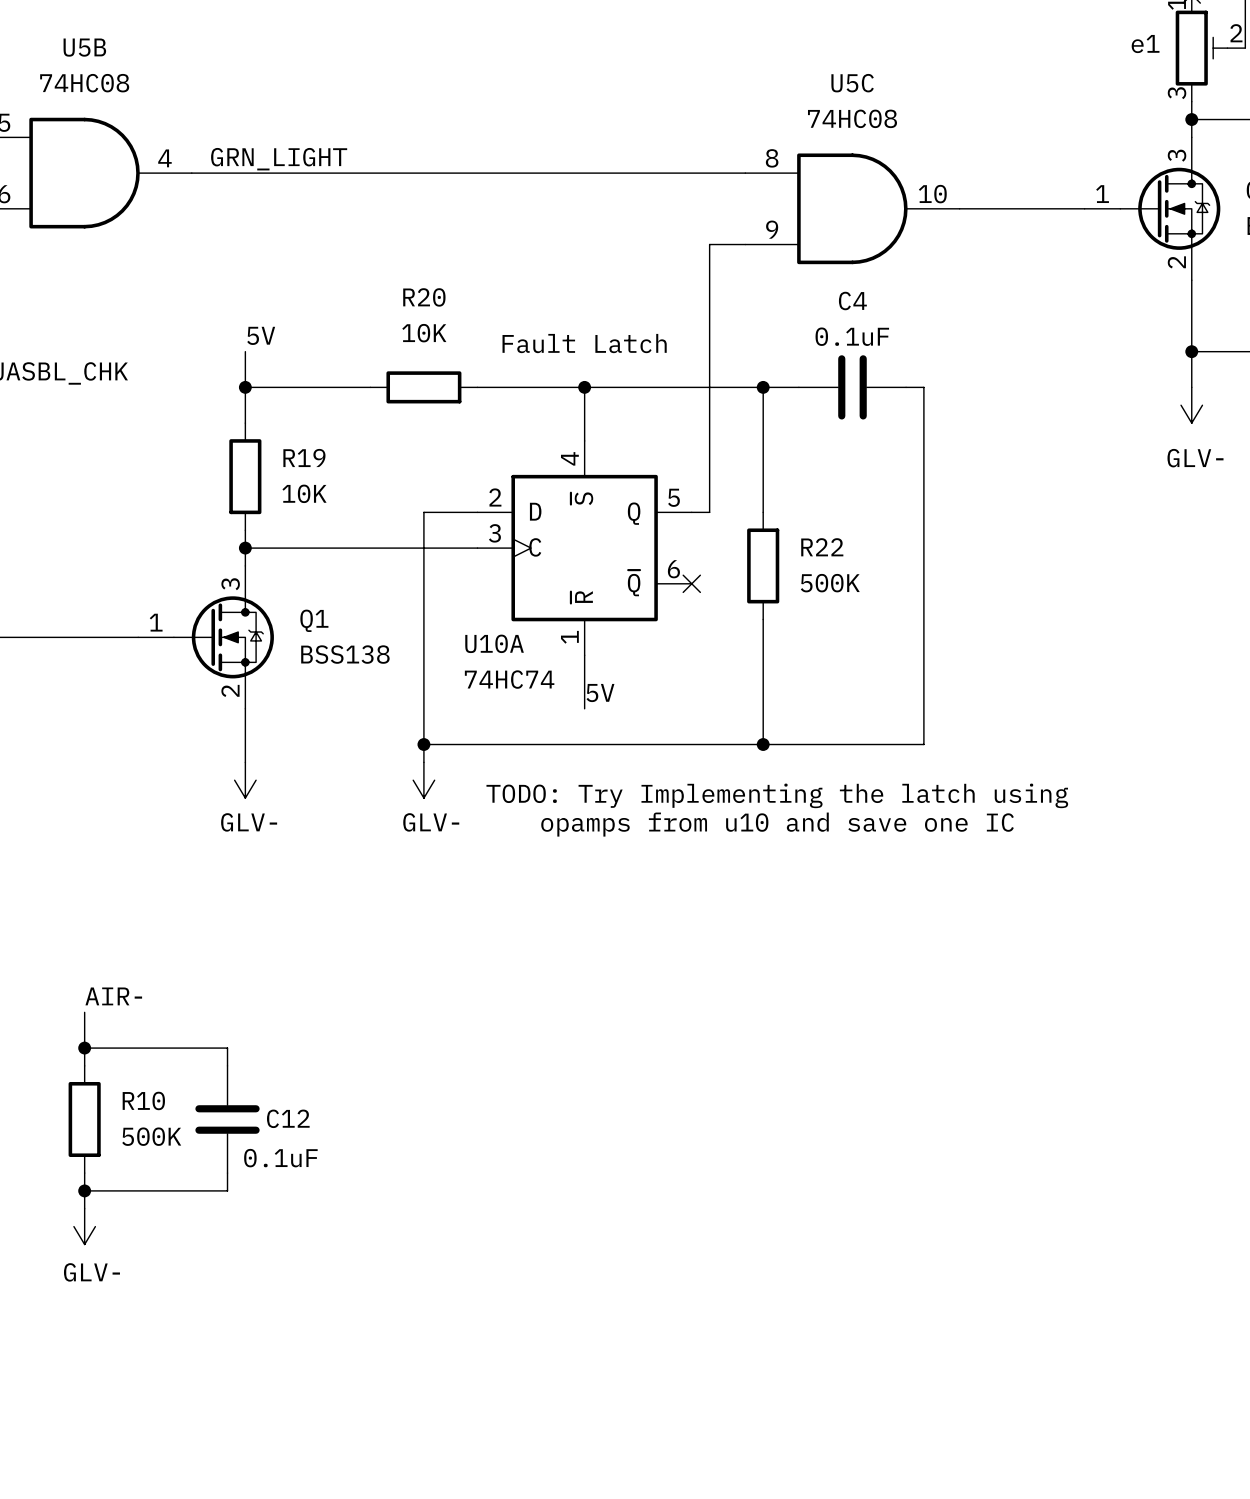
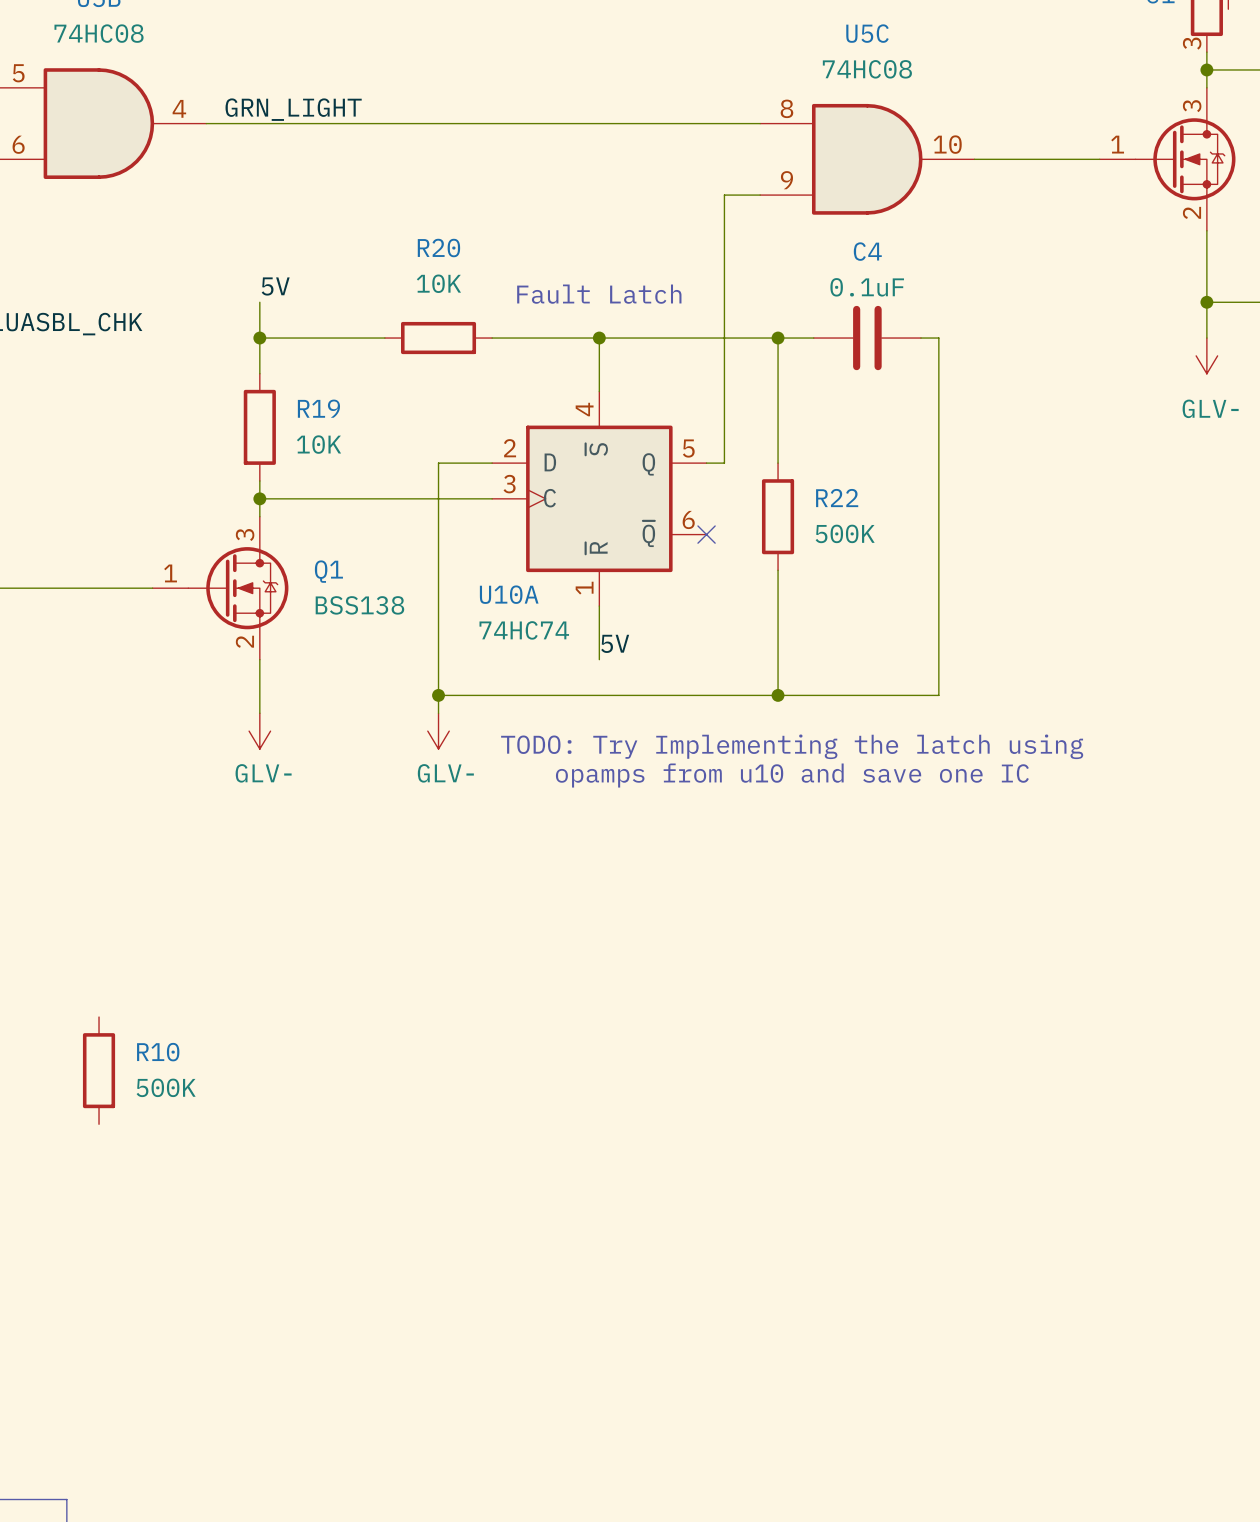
label: AIR- (113, 996) -> none
wire: (84, 1012) (84, 1065) -> none
wire: (84, 1048) (227, 1048) (227, 1065) -> none
junction: (84, 1048) -> none
C12: 0.1uF (227, 1119) -> none
wire: (84, 1173) (84, 1208) -> none
wire: (227, 1173) (227, 1190) (84, 1190) -> none
junction: (84, 1190) -> none
power symbol: GLV- (84, 1226) -> none

